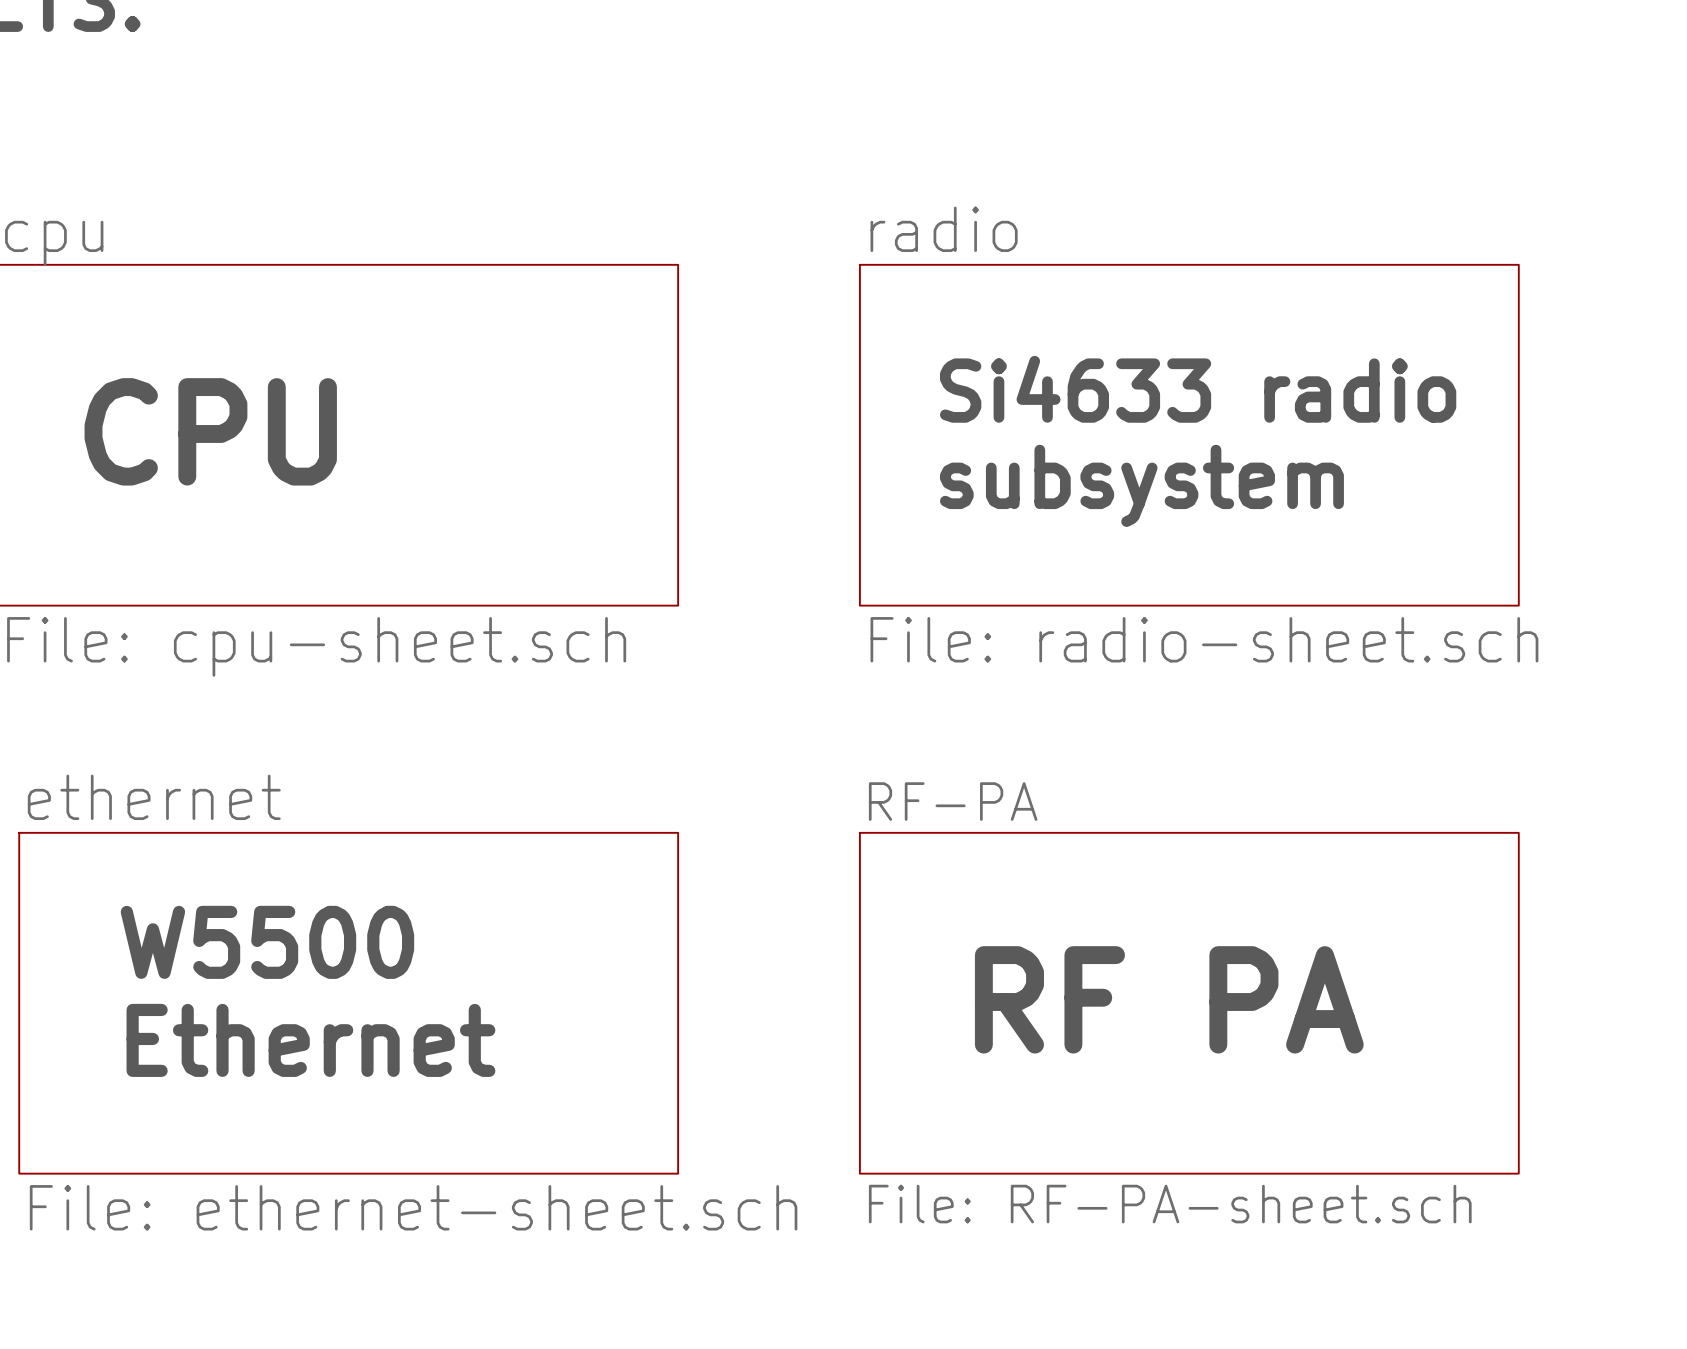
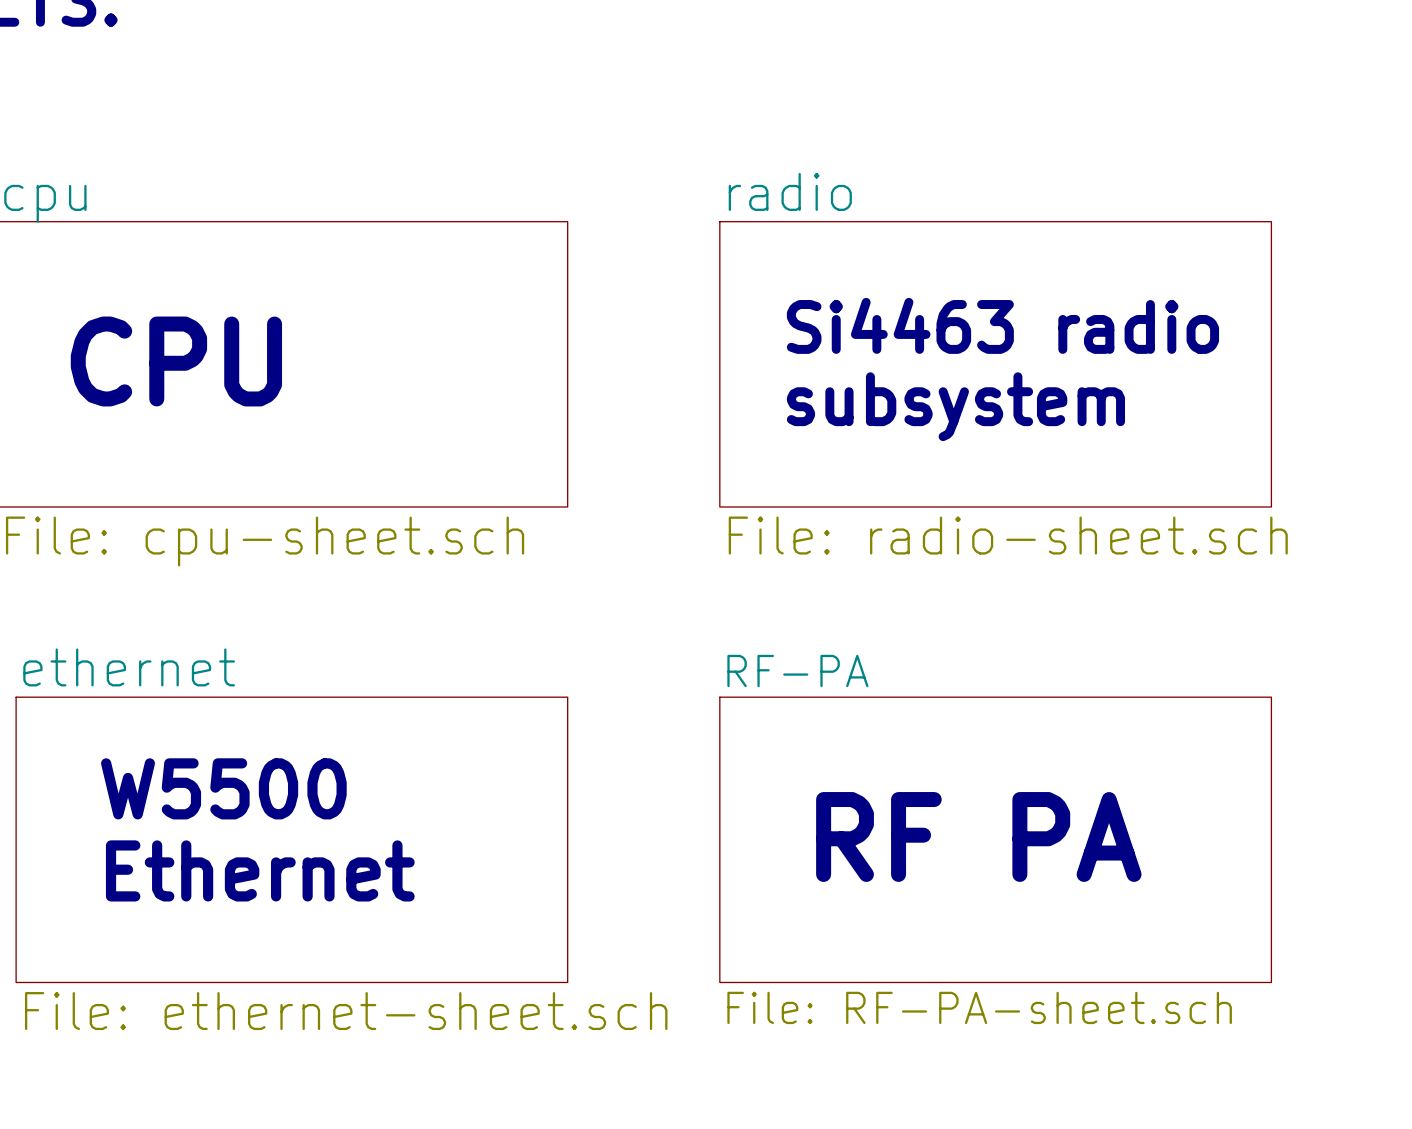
text: Si4633 radio (1198, 389) -> Si4463 radio (1002, 325)

